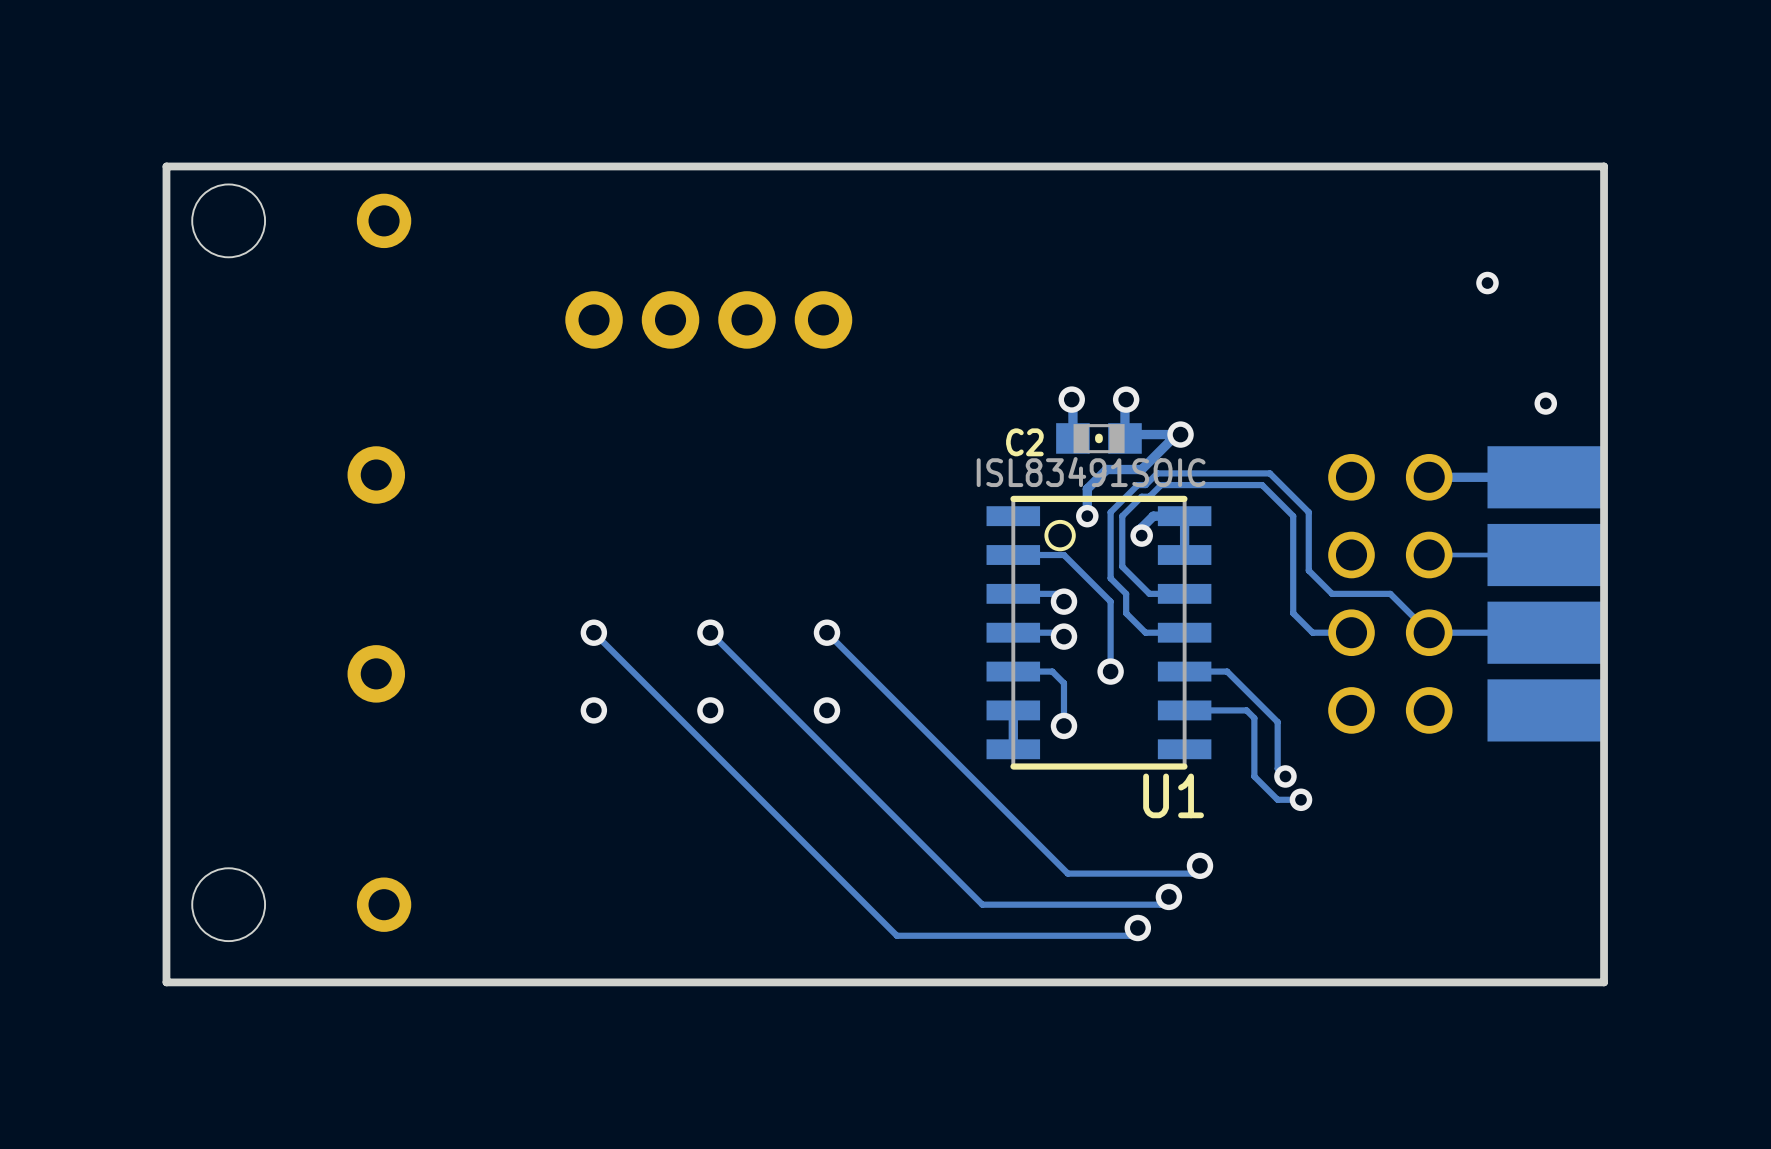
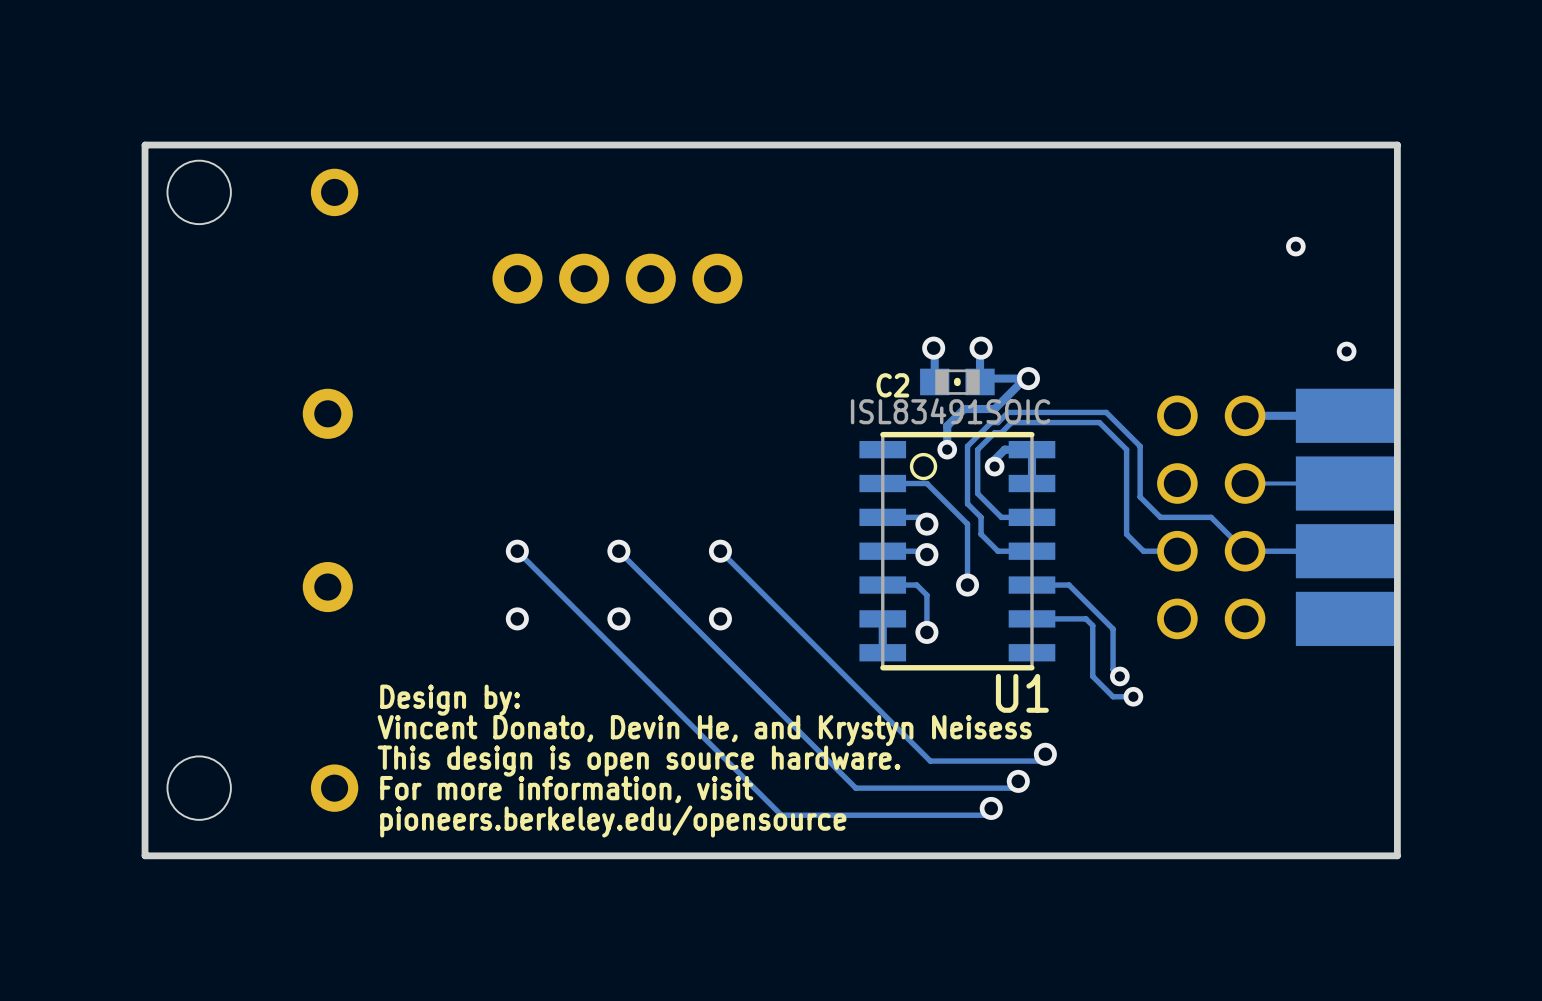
text: none -> Design by: (450, 700)
text: none -> Vincent Donato, Devin He, and Krystyn Neisess (704, 730)
text: none -> This design is open source hardware. (638, 761)
text: none -> For more information, visit (566, 789)
text: none -> pioneers.berkeley.edu/opensource (613, 821)

